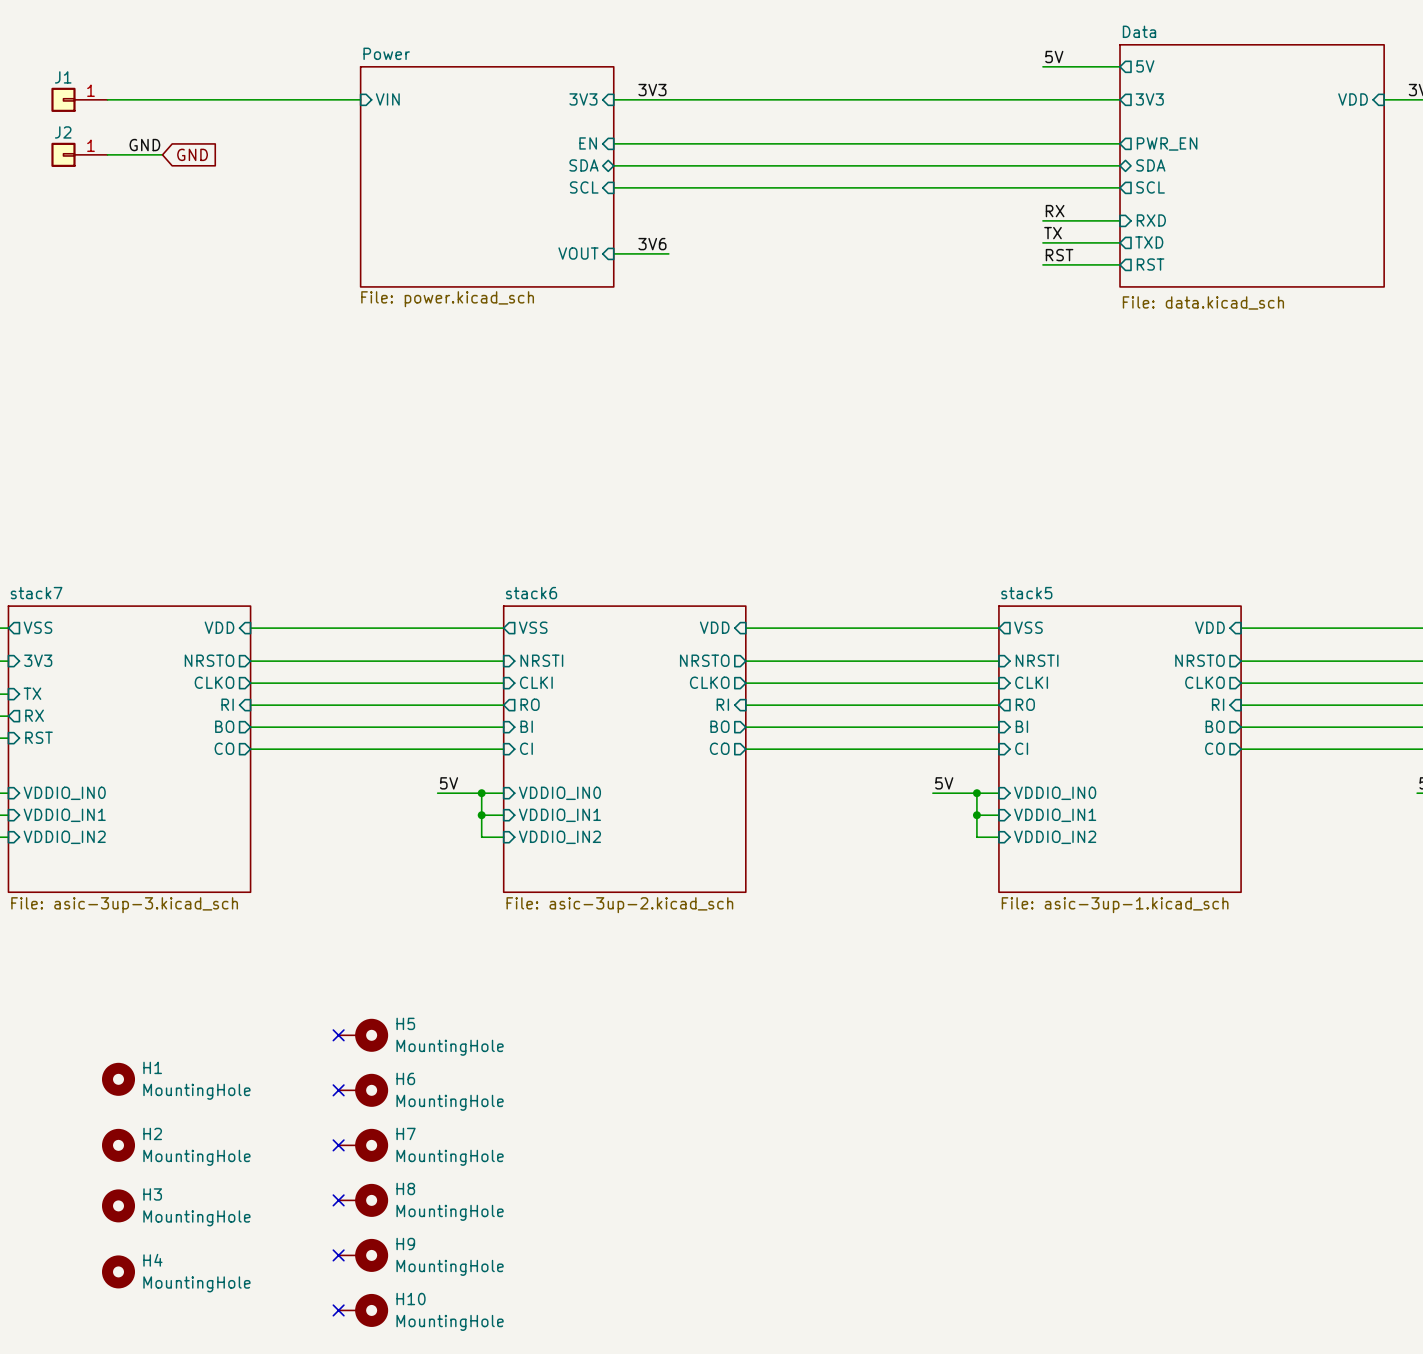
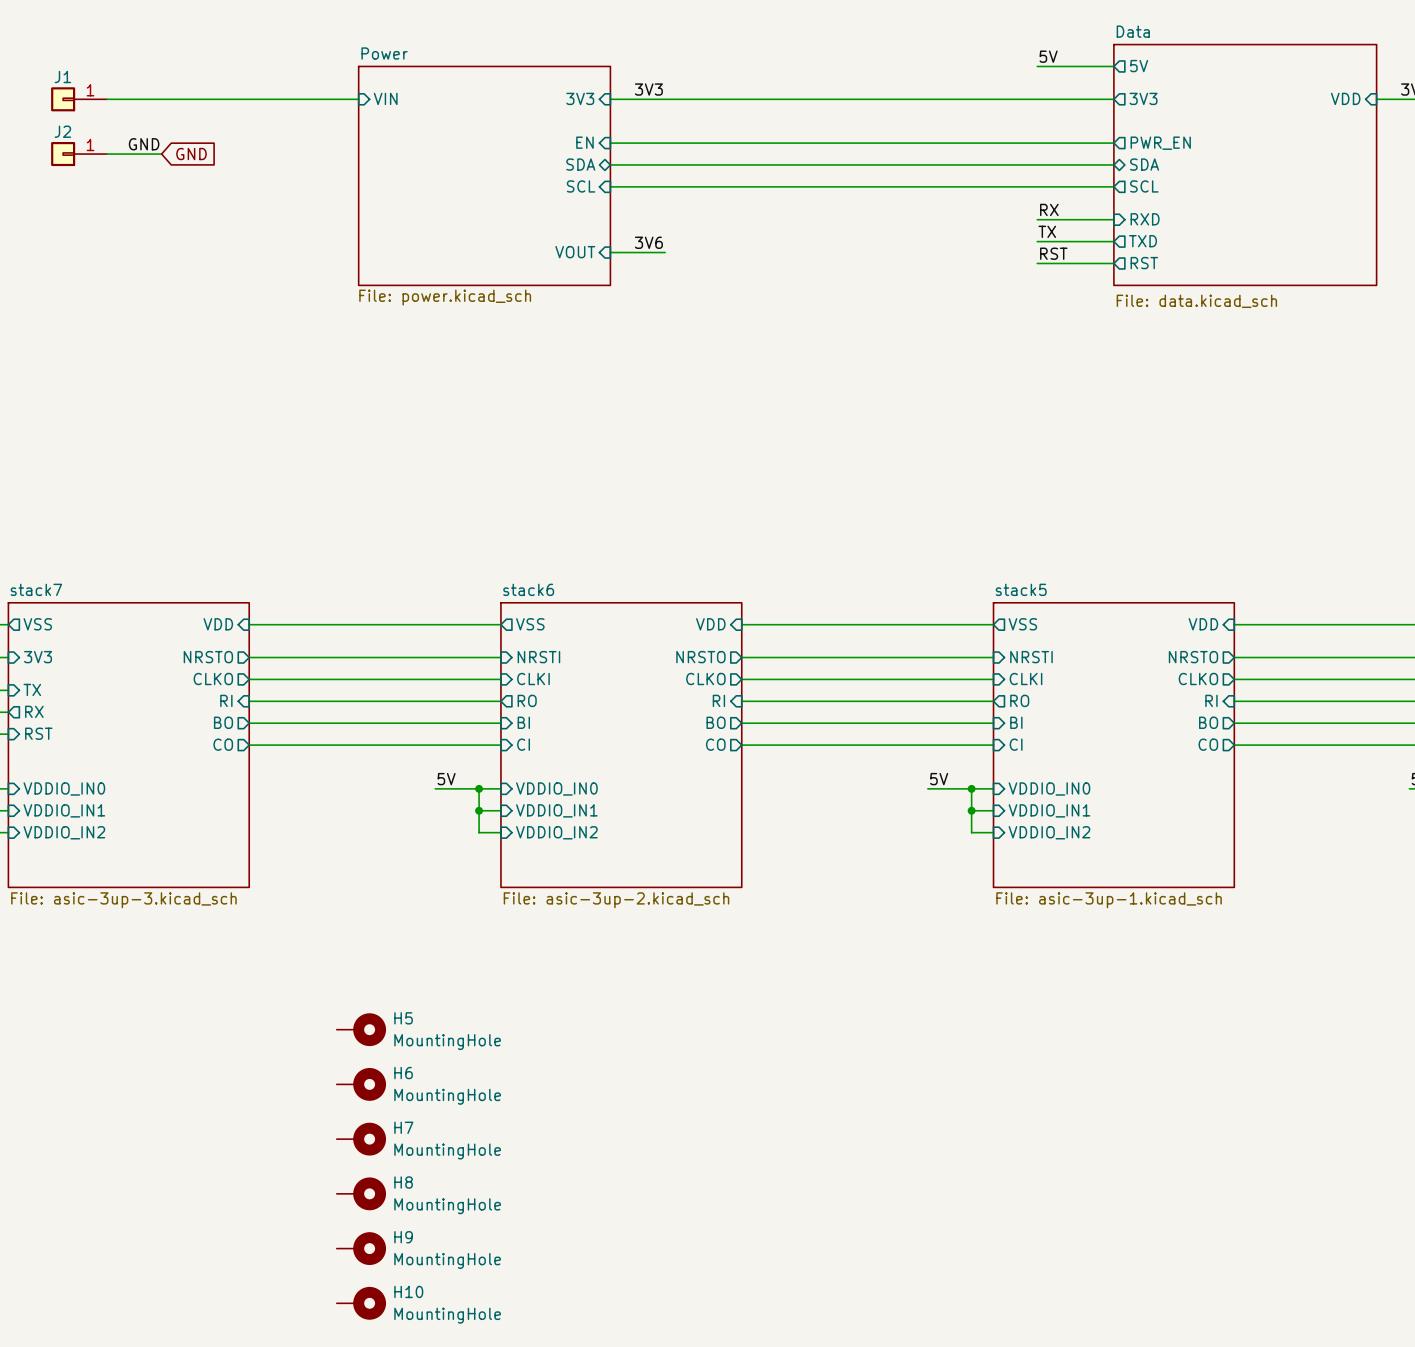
no-connect mark: (338, 1035) -> none
H1: MountingHole (118, 1079) -> none
no-connect mark: (338, 1090) -> none
H2: MountingHole (118, 1145) -> none
no-connect mark: (338, 1145) -> none
no-connect mark: (338, 1200) -> none
H3: MountingHole (118, 1205) -> none
no-connect mark: (338, 1255) -> none
H4: MountingHole (118, 1271) -> none
no-connect mark: (338, 1310) -> none

